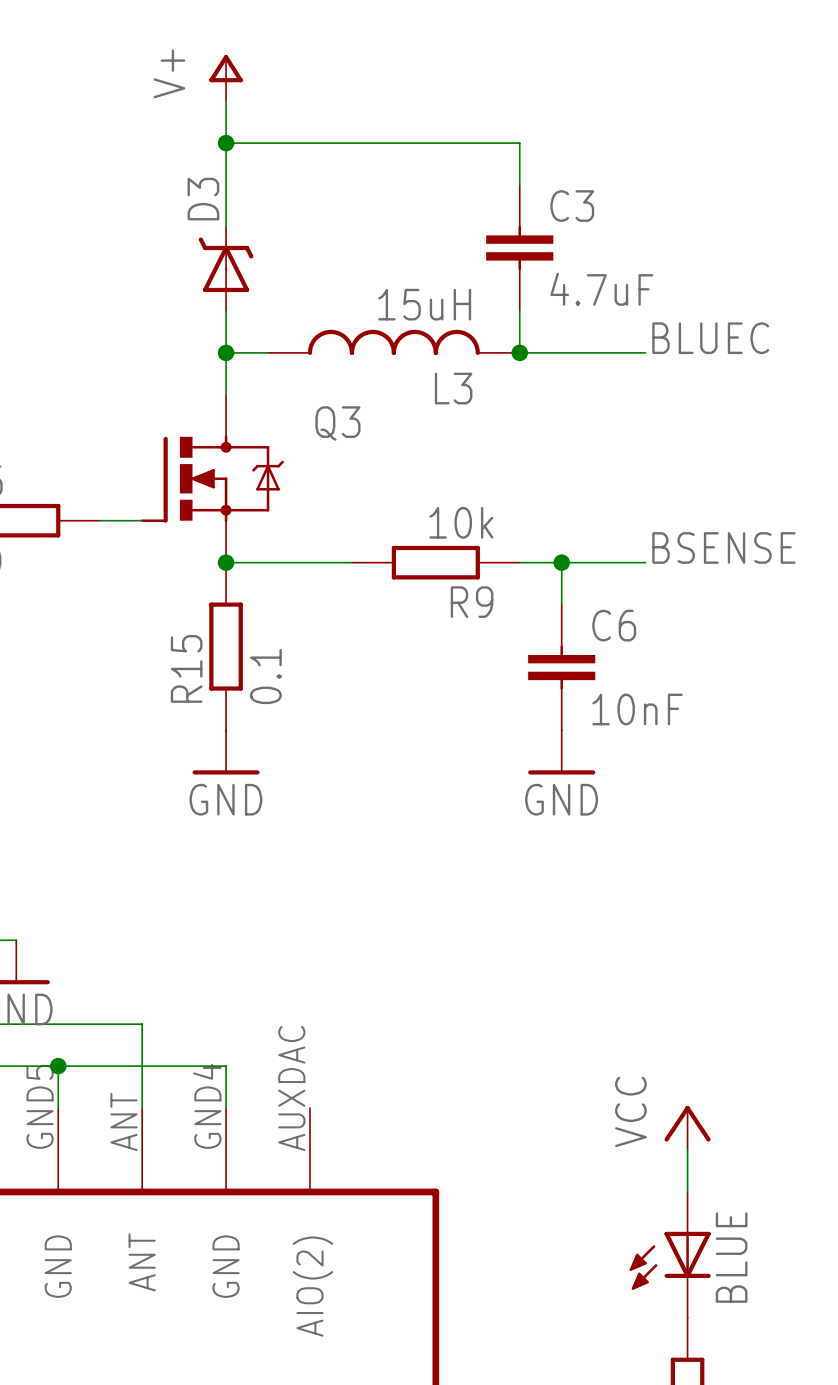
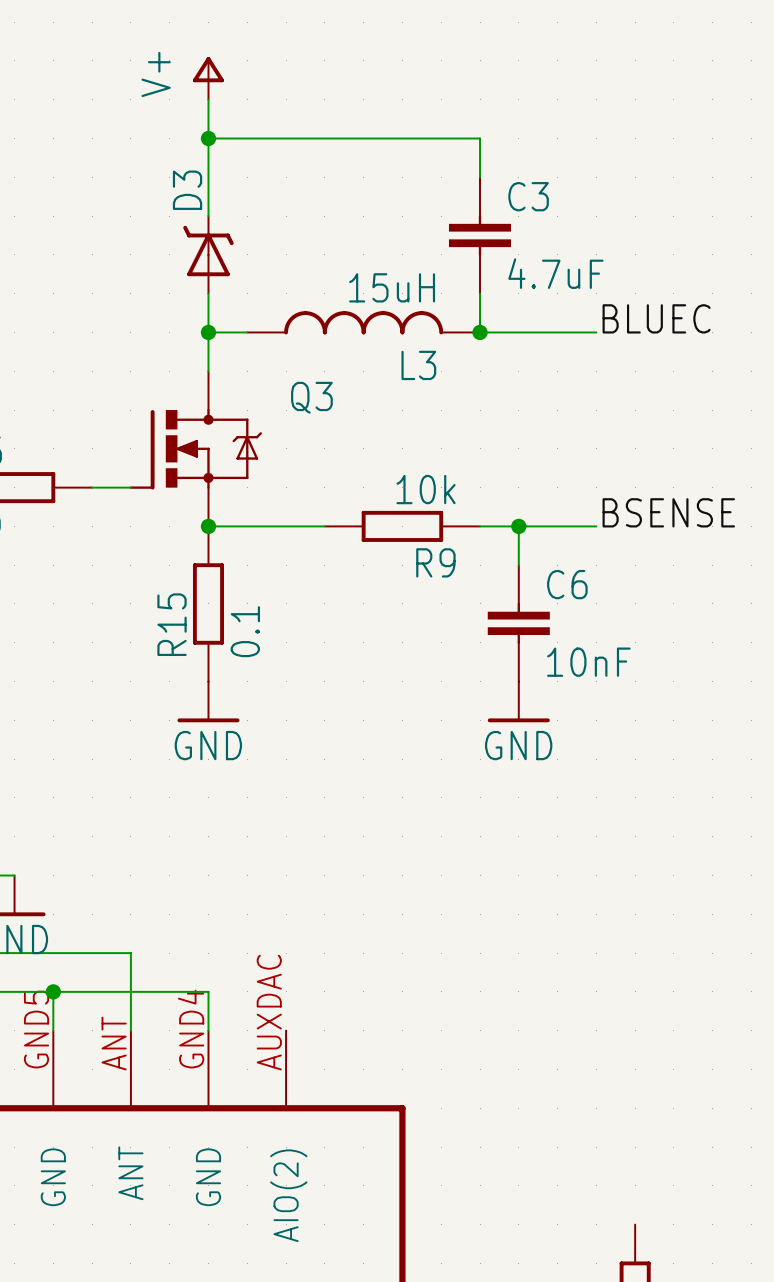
power symbol: VCC (687, 1127) -> none
wire: (687, 1150) (687, 1191) -> none
BLUE: (670, 1254) -> none

